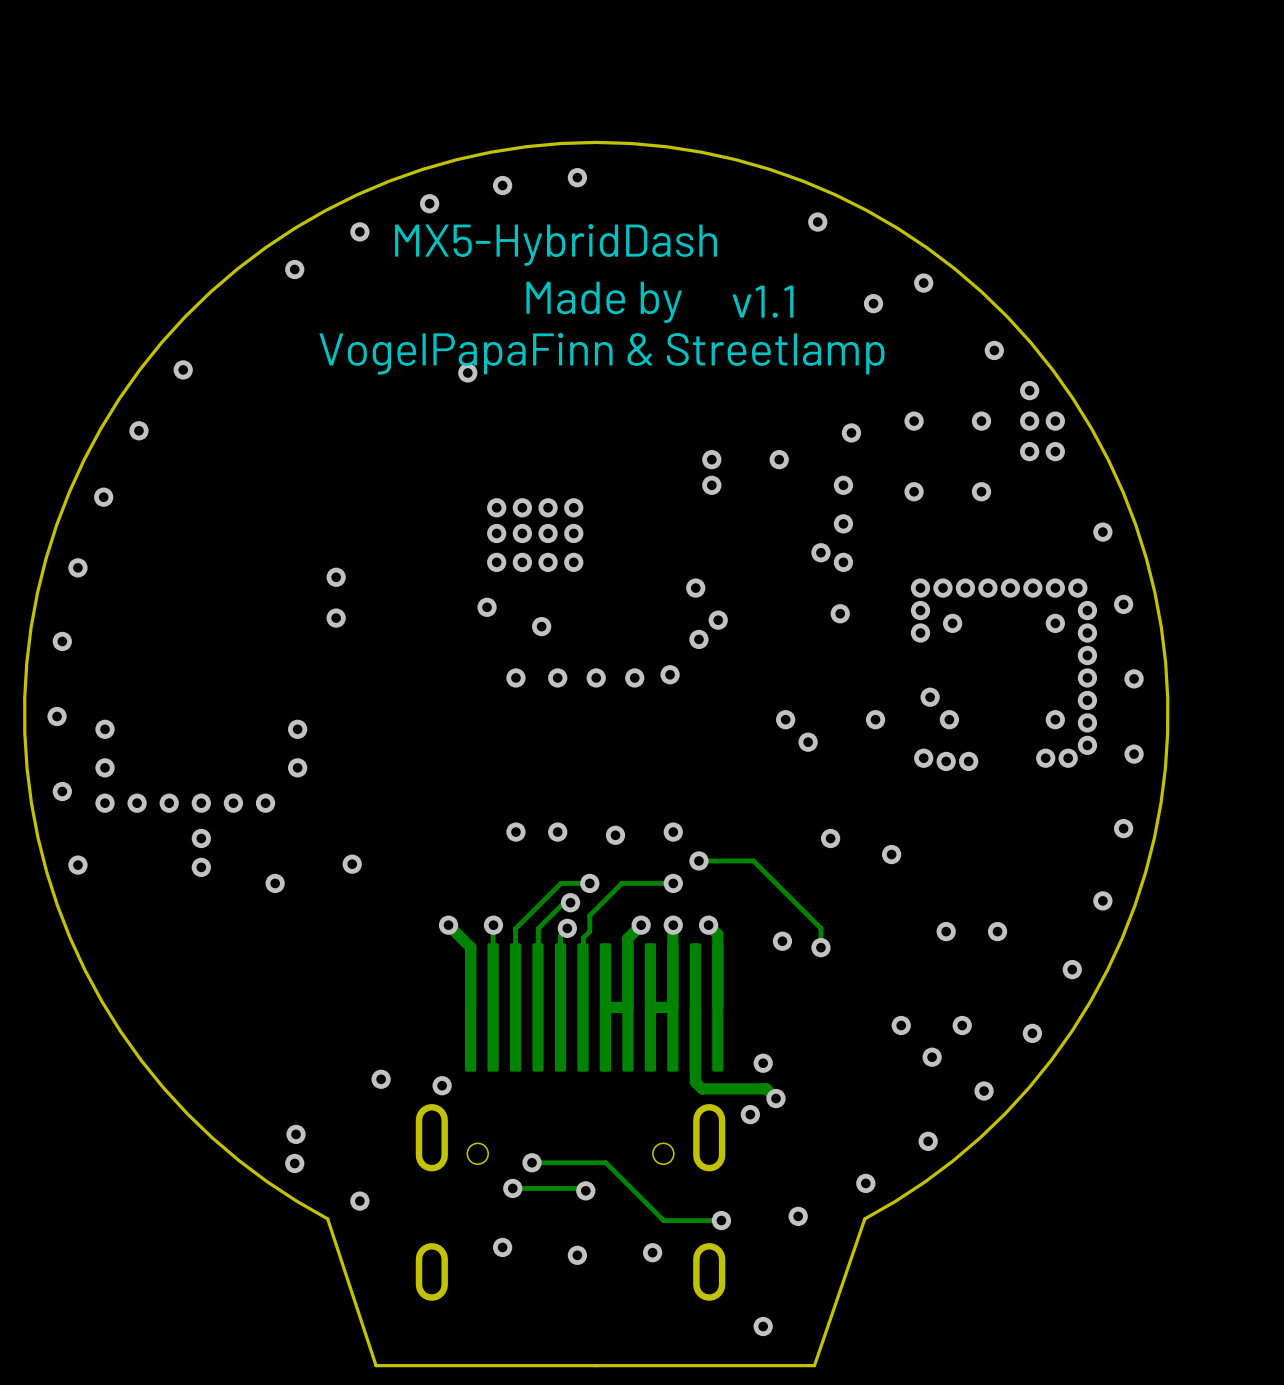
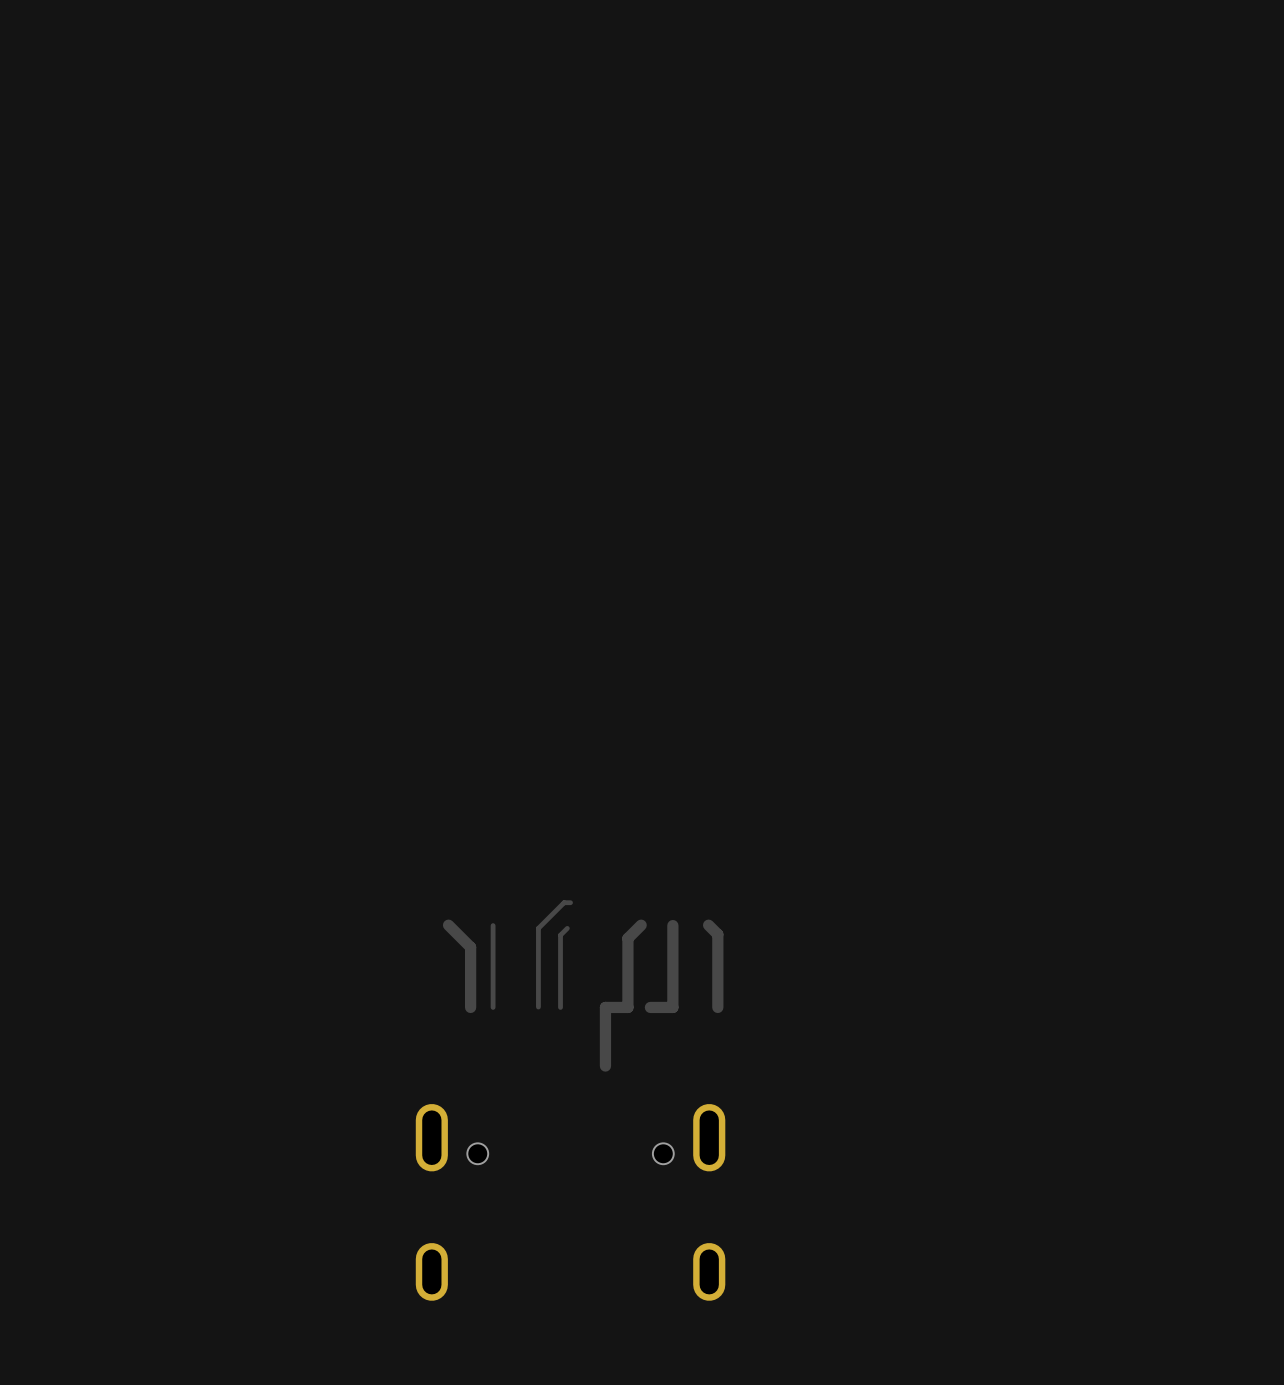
via: (577, 177) -> none
via: (502, 185) -> none
via: (429, 203) -> none
via: (817, 222) -> none
via: (359, 231) -> none
text: MX5-HybridDash (556, 244) -> none
via: (294, 269) -> none
via: (923, 283) -> none
text: v1.1 (762, 301) -> none
text: Made by (604, 302) -> none
via: (873, 303) -> none
via: (994, 350) -> none
text: VogelPapaFinn & Streetlamp (601, 353) -> none
via: (183, 369) -> none
via: (467, 372) -> none
via: (1029, 390) -> none
via: (914, 421) -> none
via: (981, 421) -> none
via: (1029, 421) -> none
via: (1055, 421) -> none
via: (138, 430) -> none
via: (851, 432) -> none
via: (1029, 451) -> none
via: (1055, 451) -> none
via: (711, 459) -> none
via: (779, 459) -> none
via: (711, 485) -> none
via: (843, 485) -> none
via: (914, 491) -> none
via: (981, 491) -> none
via: (103, 497) -> none
via: (496, 507) -> none
via: (522, 507) -> none
via: (548, 507) -> none
via: (573, 507) -> none
via: (843, 523) -> none
via: (1102, 532) -> none
via: (496, 533) -> none
via: (522, 533) -> none
via: (548, 533) -> none
via: (573, 533) -> none
via: (820, 552) -> none
via: (496, 562) -> none
via: (522, 562) -> none
via: (548, 562) -> none
via: (573, 562) -> none
via: (843, 562) -> none
via: (77, 567) -> none
via: (336, 577) -> none
via: (695, 588) -> none
via: (920, 588) -> none
via: (942, 588) -> none
via: (965, 588) -> none
via: (987, 588) -> none
via: (1010, 588) -> none
via: (1032, 588) -> none
via: (1055, 588) -> none
via: (1077, 588) -> none
via: (1123, 604) -> none
via: (487, 607) -> none
via: (920, 610) -> none
via: (1087, 610) -> none
via: (840, 613) -> none
via: (336, 618) -> none
via: (718, 620) -> none
via: (952, 623) -> none
via: (1055, 623) -> none
via: (541, 626) -> none
via: (920, 633) -> none
via: (1087, 633) -> none
via: (698, 639) -> none
via: (62, 641) -> none
via: (1087, 655) -> none
via: (670, 674) -> none
via: (515, 677) -> none
via: (557, 677) -> none
via: (596, 677) -> none
via: (634, 677) -> none
via: (1087, 677) -> none
via: (1134, 678) -> none
via: (930, 697) -> none
via: (1087, 700) -> none
via: (57, 716) -> none
via: (785, 719) -> none
via: (875, 719) -> none
via: (949, 719) -> none
via: (1055, 719) -> none
via: (1087, 722) -> none
via: (105, 729) -> none
via: (297, 729) -> none
via: (808, 742) -> none
via: (1087, 745) -> none
via: (1134, 754) -> none
via: (923, 758) -> none
via: (1045, 758) -> none
via: (1068, 758) -> none
via: (946, 761) -> none
via: (968, 761) -> none
via: (105, 767) -> none
via: (297, 767) -> none
via: (62, 791) -> none
via: (105, 803) -> none
via: (137, 803) -> none
via: (169, 803) -> none
via: (201, 803) -> none
via: (233, 803) -> none
via: (265, 803) -> none
via: (1123, 828) -> none
via: (515, 832) -> none
via: (557, 832) -> none
via: (673, 832) -> none
via: (615, 835) -> none
via: (201, 838) -> none
via: (830, 838) -> none
via: (891, 854) -> none
track: (698, 860) (753, 860) (820, 928) (820, 947) -> none
via: (698, 860) -> none
via: (352, 864) -> none
via: (77, 865) -> none
via: (201, 867) -> none
via: (275, 883) -> none
track: (589, 883) (560, 883) (515, 928) (515, 1007) -> none
via: (589, 883) -> none
track: (673, 883) (621, 883) (589, 915) (589, 931) (583, 938) (583, 1007) -> none
via: (673, 883) -> none
via: (1102, 900) -> none
via: (570, 902) -> none
via: (448, 925) -> none
via: (493, 925) -> none
via: (641, 925) -> none
via: (673, 925) -> none
via: (708, 925) -> none
via: (567, 928) -> none
via: (946, 931) -> none
via: (997, 931) -> none
via: (782, 941) -> none
via: (820, 947) -> none
via: (1072, 969) -> none
part: (594, 1007) -> none
track: (695, 1007) (695, 1082) (702, 1088) (766, 1088) (776, 1098) -> none
via: (901, 1025) -> none
via: (962, 1025) -> none
via: (1032, 1033) -> none
via: (932, 1057) -> none
via: (763, 1063) -> none
via: (381, 1079) -> none
via: (442, 1085) -> none
via: (984, 1091) -> none
via: (776, 1098) -> none
via: (750, 1114) -> none
via: (296, 1134) -> none
via: (928, 1141) -> none
track: (532, 1162) (605, 1162) (663, 1220) (721, 1220) -> none
via: (532, 1162) -> none
via: (294, 1163) -> none
via: (865, 1183) -> none
via: (512, 1188) -> none
track: (580, 1188) (512, 1188) -> none
via: (585, 1190) -> none
via: (359, 1201) -> none
via: (798, 1216) -> none
board edge: (864, 1218) (814, 1365) (376, 1365) (327, 1218) (267, 1182) (212, 1138) (187, 1113) (141, 1060) (120, 1031) (85, 970) (57, 905) (46, 872) (31, 803) (27, 768) (24, 733) (26, 662) (31, 627) (46, 558) (69, 492) (100, 429) (119, 399) (161, 342) (185, 316) (237, 269) (294, 228) (325, 210) (356, 194) (422, 169) (491, 152) (560, 143) (631, 143) (666, 146) (701, 152) (769, 169) (835, 194) (867, 210) (926, 247) (955, 269) (1007, 316) (1030, 342) (1052, 370) (1091, 429) (1123, 492) (1135, 525) (1146, 558) (1161, 627) (1165, 662) (1167, 733) (1160, 803) (1145, 872) (1122, 938) (1107, 970) (1071, 1031) (1029, 1087) (1005, 1113) (953, 1160) (924, 1182) (864, 1218) -> none
via: (721, 1220) -> none
via: (502, 1247) -> none
via: (652, 1252) -> none
via: (577, 1255) -> none
via: (763, 1326) -> none

